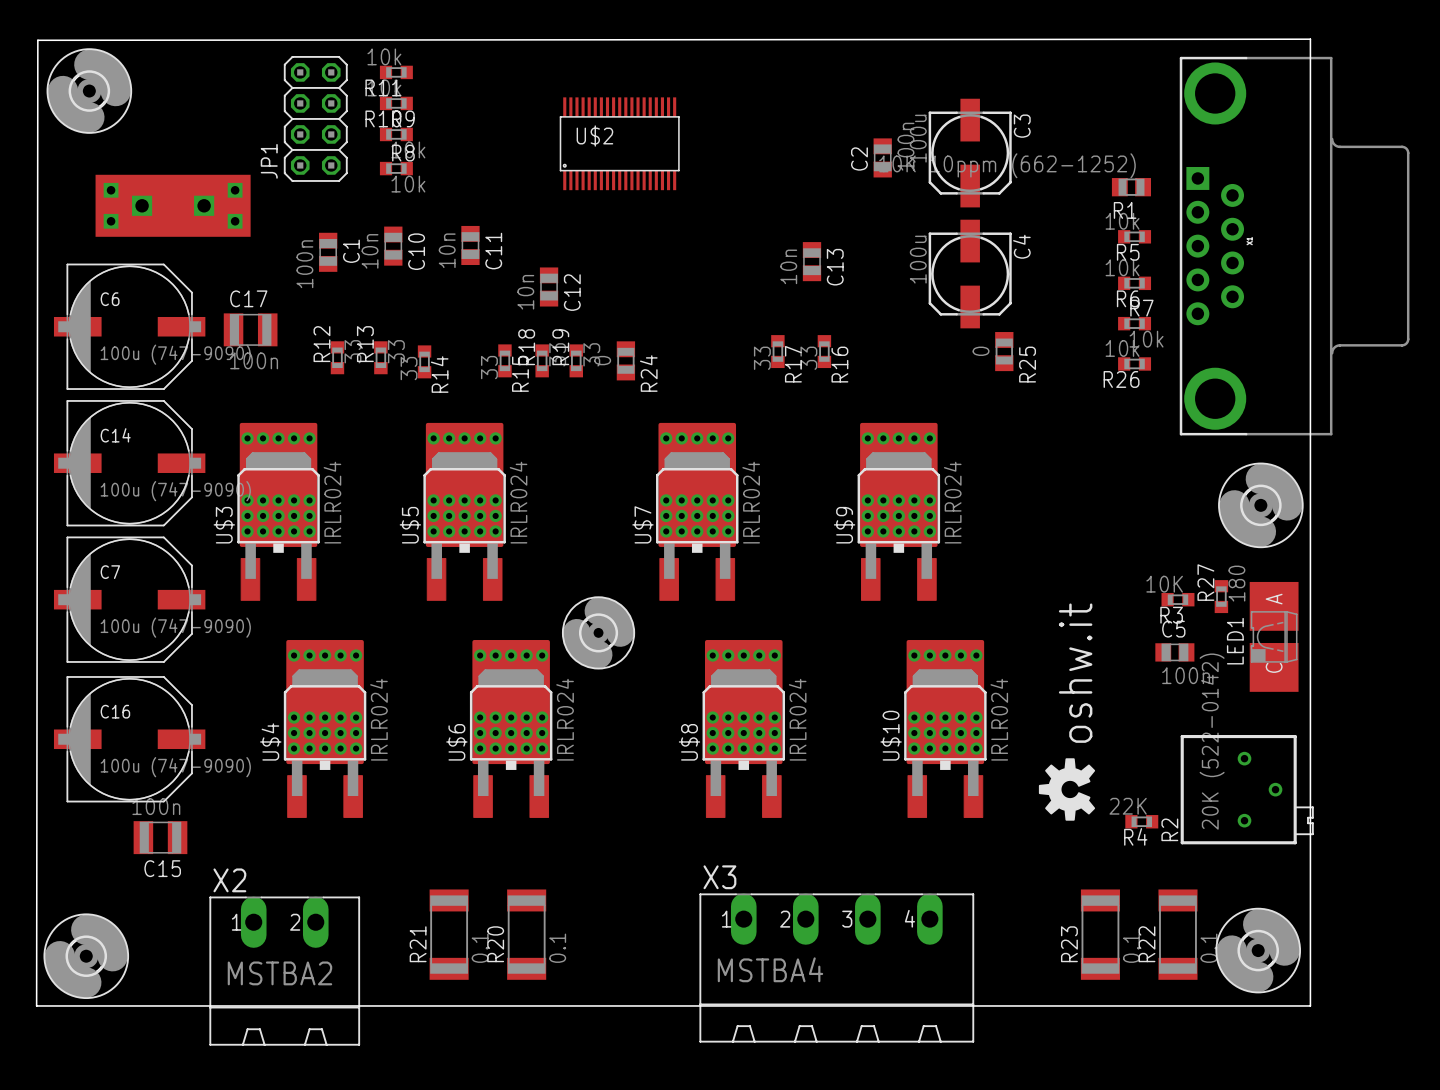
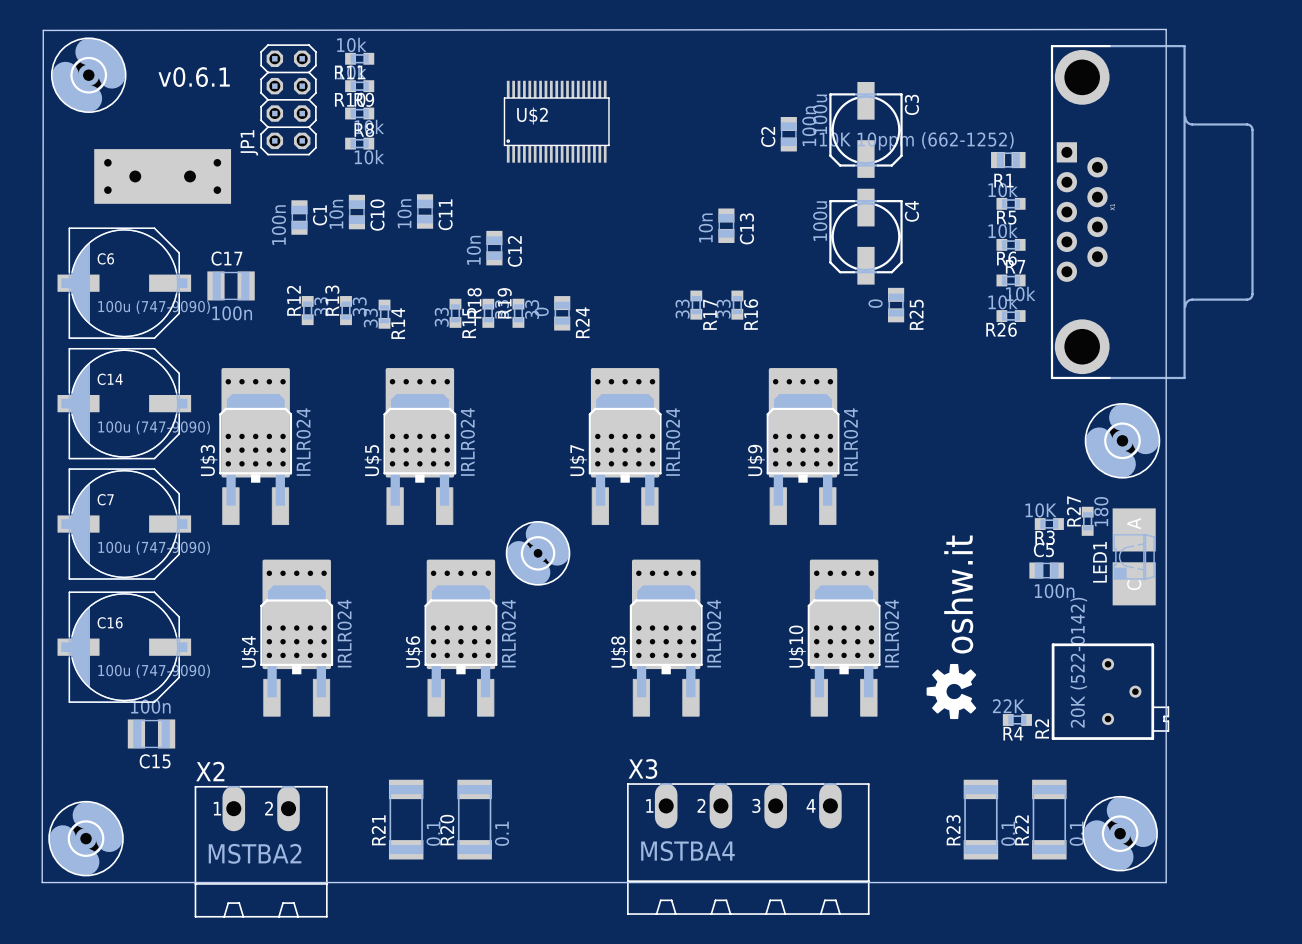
text: none -> v0.6.1 (194, 77)

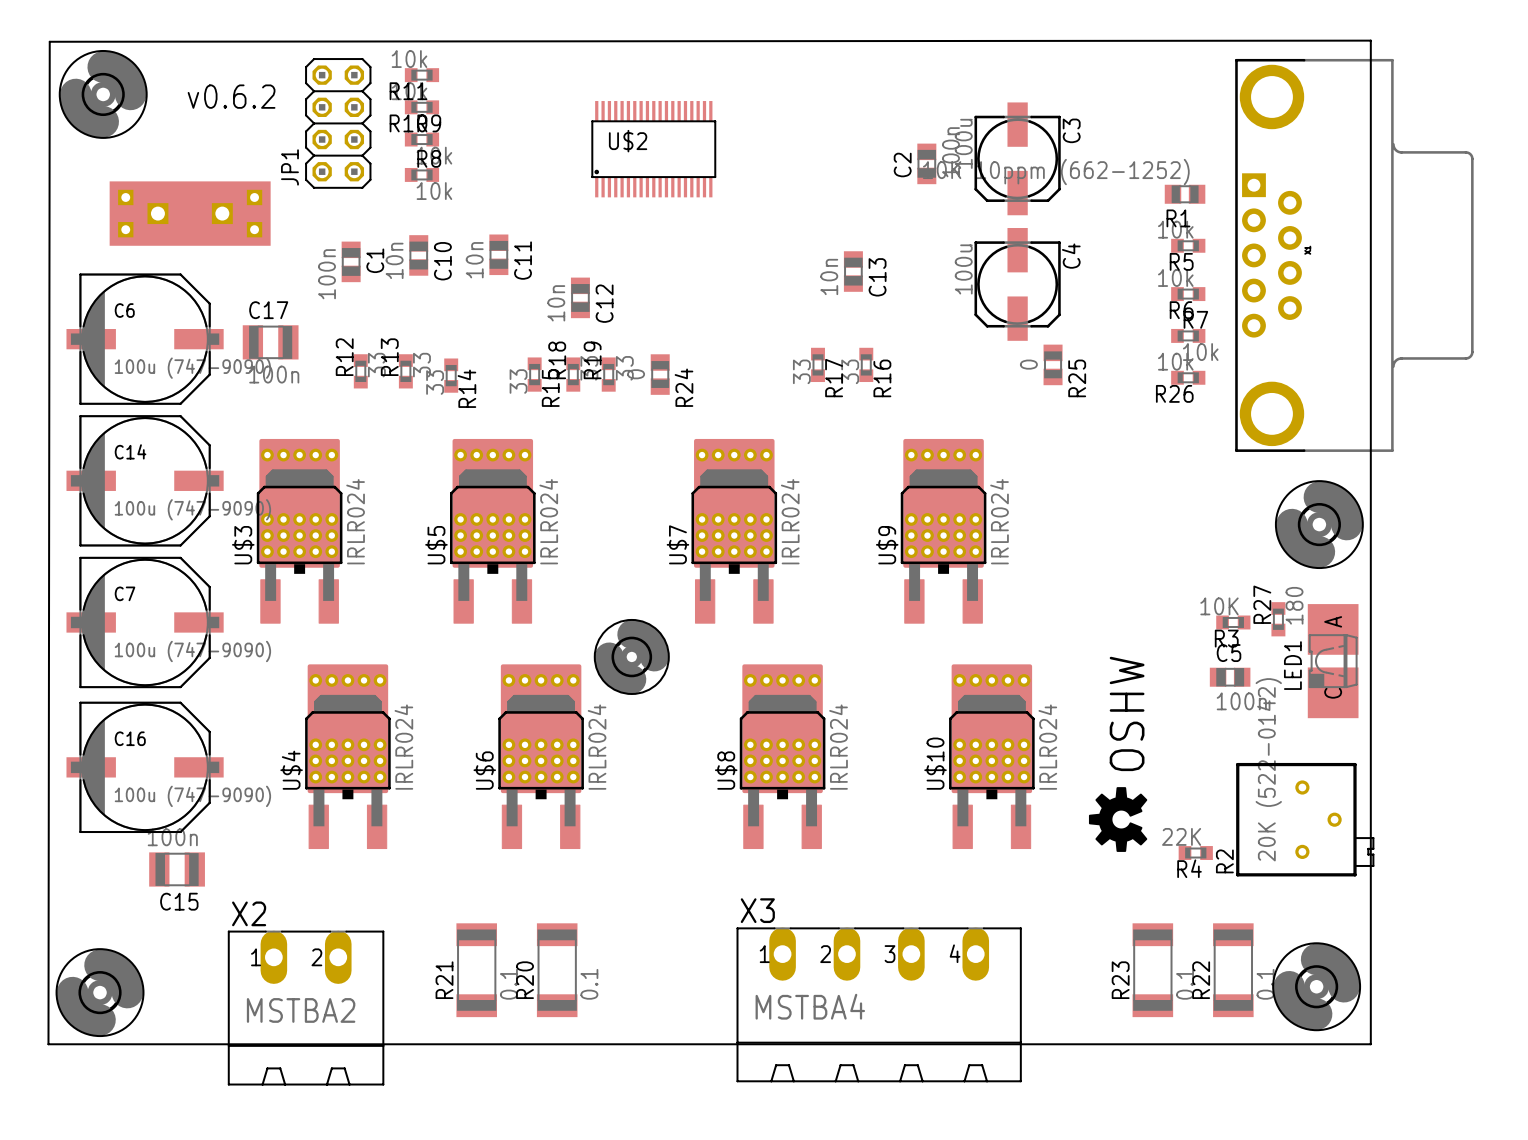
text: v0.6.1 (194, 77) -> v0.6.2 (231, 96)
text: oshw.it (958, 594) -> OSHW (1127, 713)

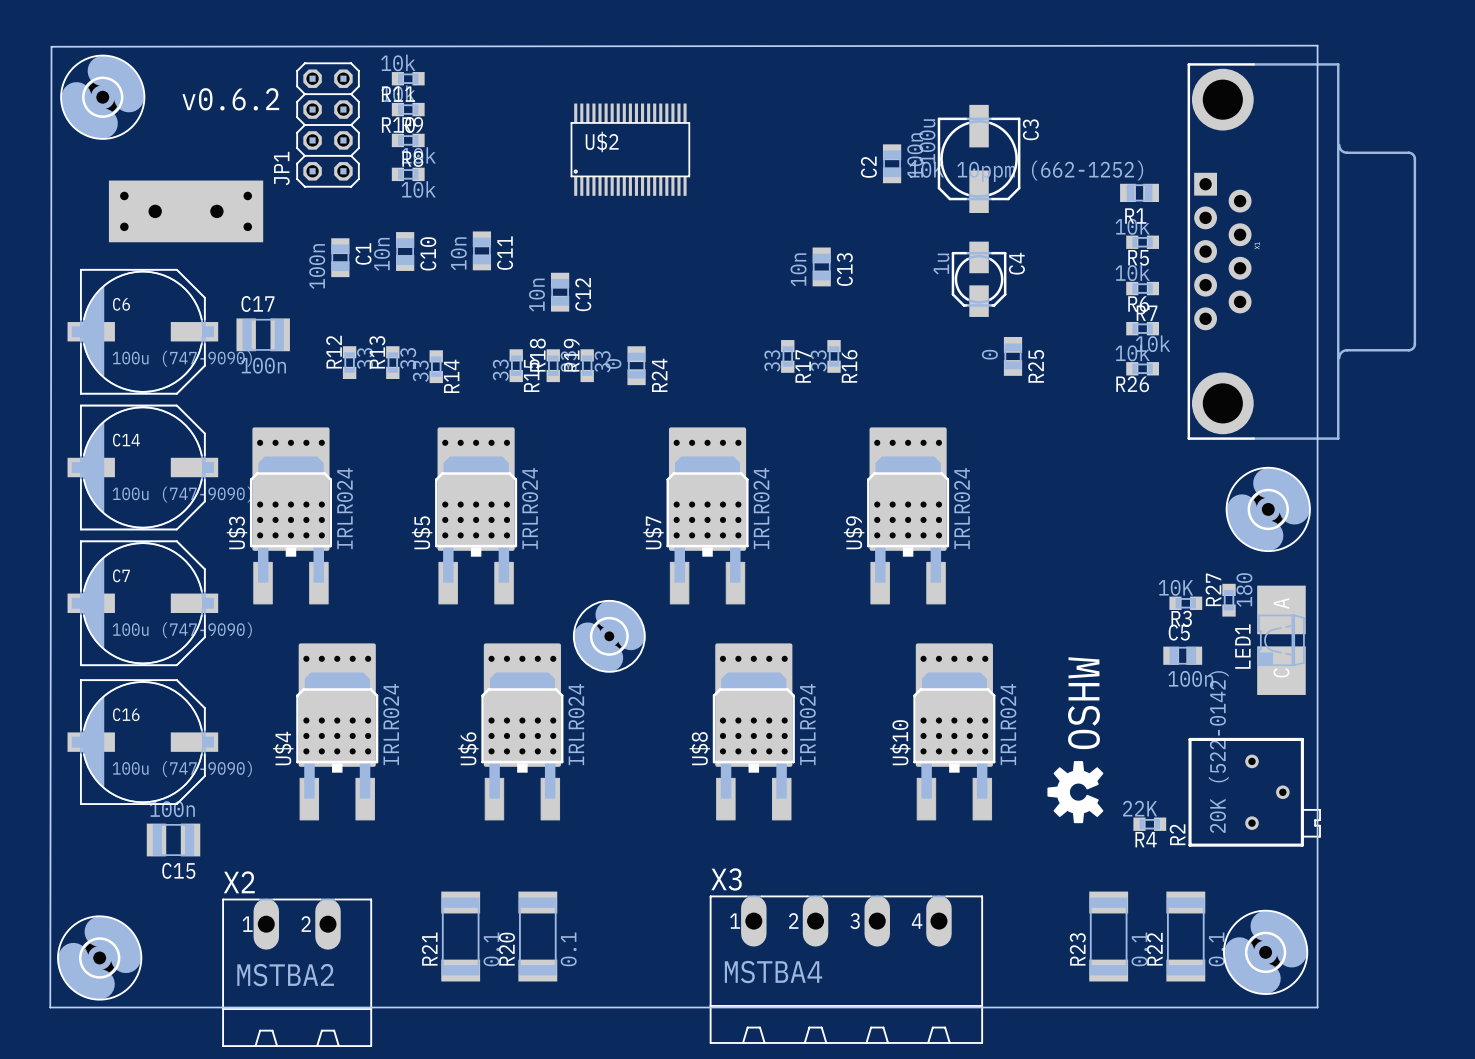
C4 footprint: [974, 228, 1061, 341] -> [951, 241, 1007, 317]
C4 value: 100u (963, 269) -> 1u (941, 264)

